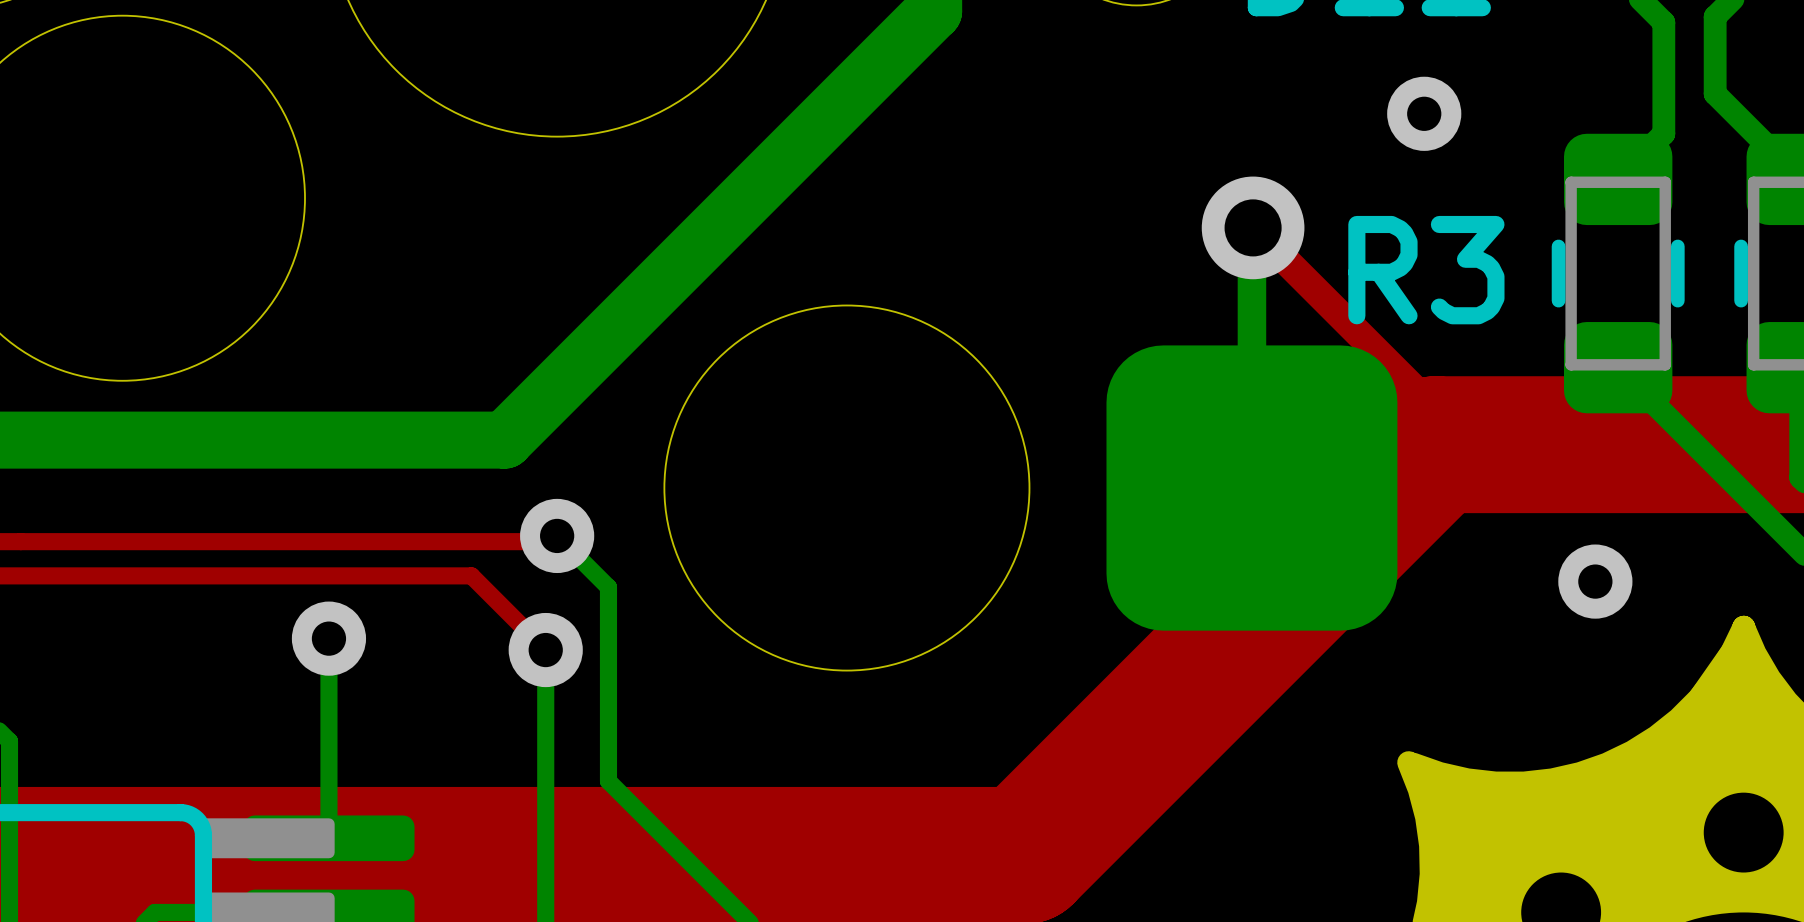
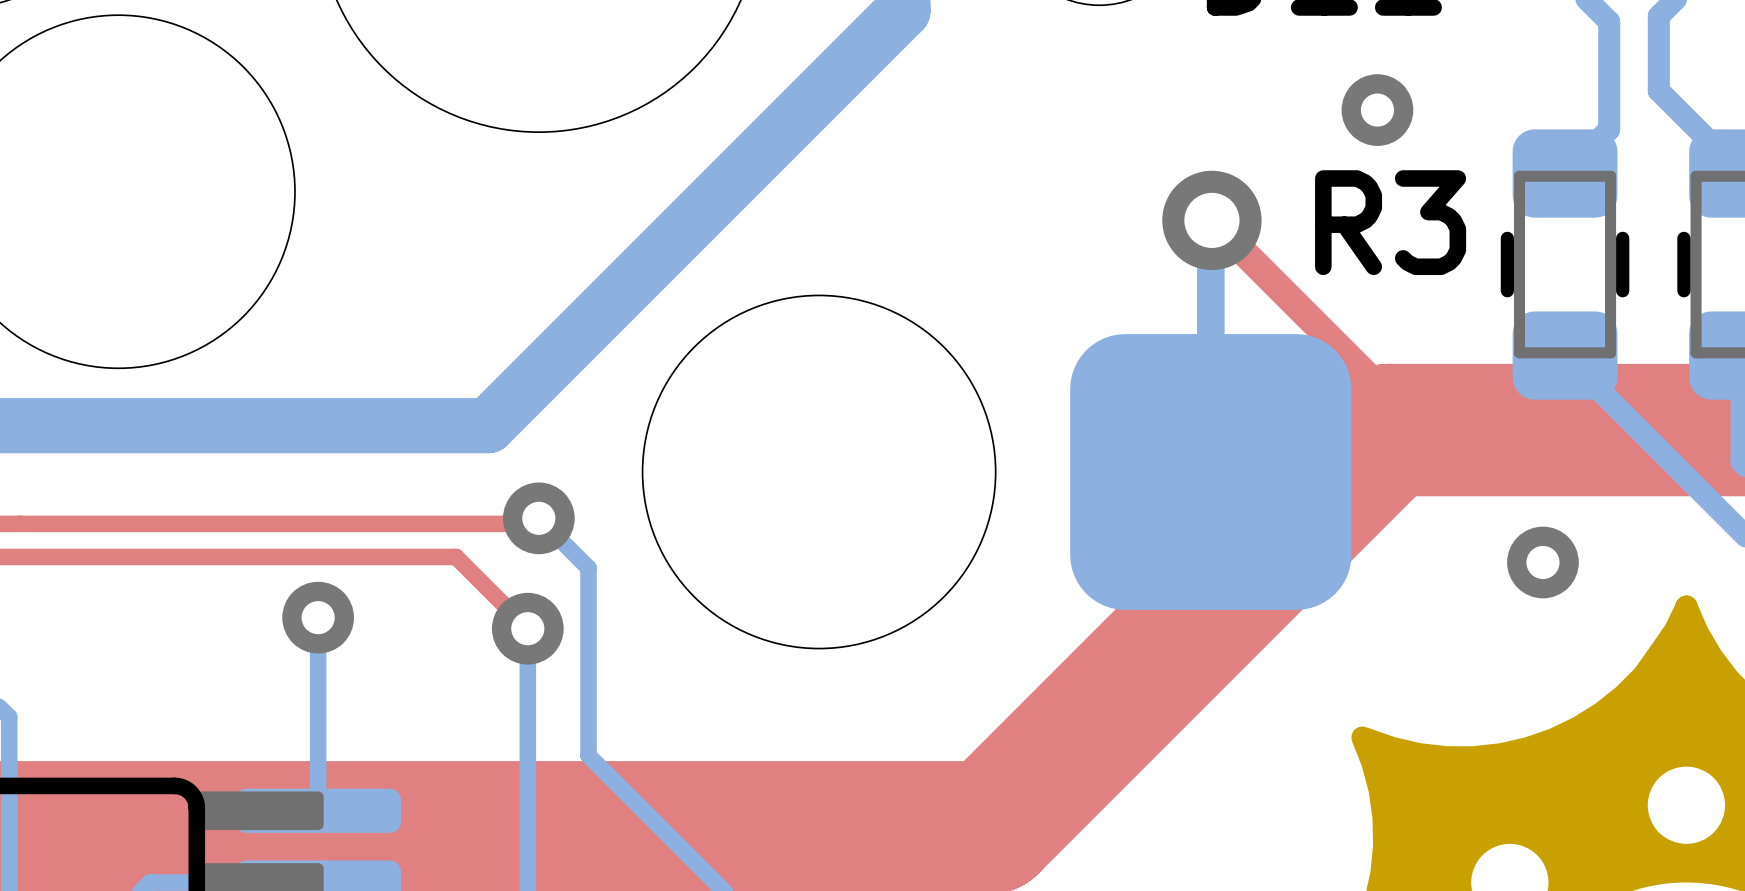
R3 name position: R3 (1426, 270) -> R3 (1390, 222)

